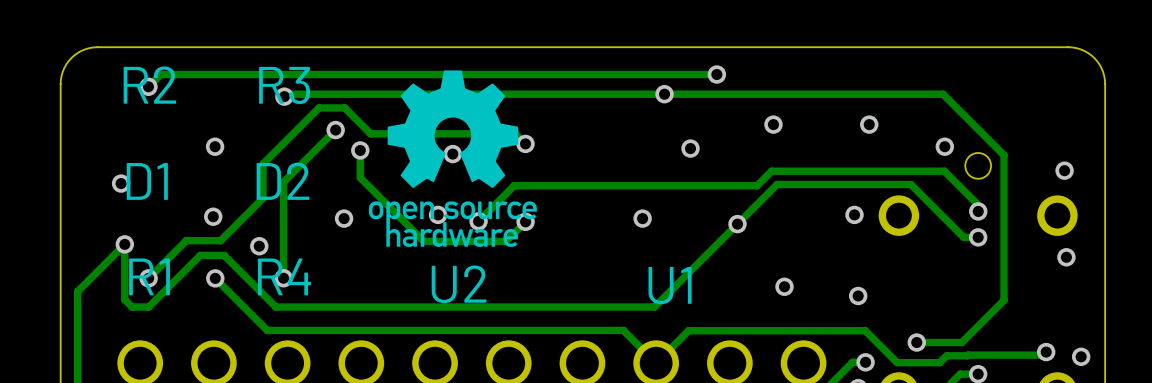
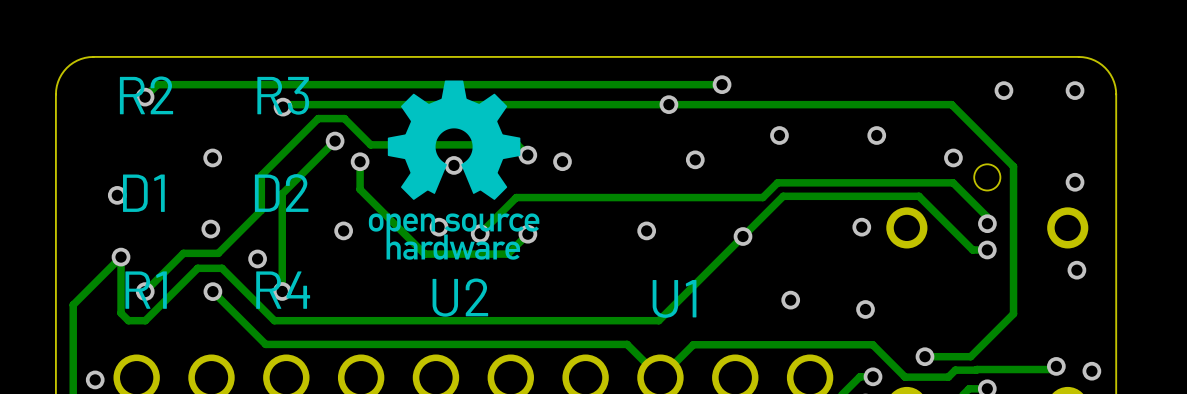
via: none -> (1003, 90)
via: none -> (1075, 90)
via: none -> (562, 161)
via: none -> (95, 379)

